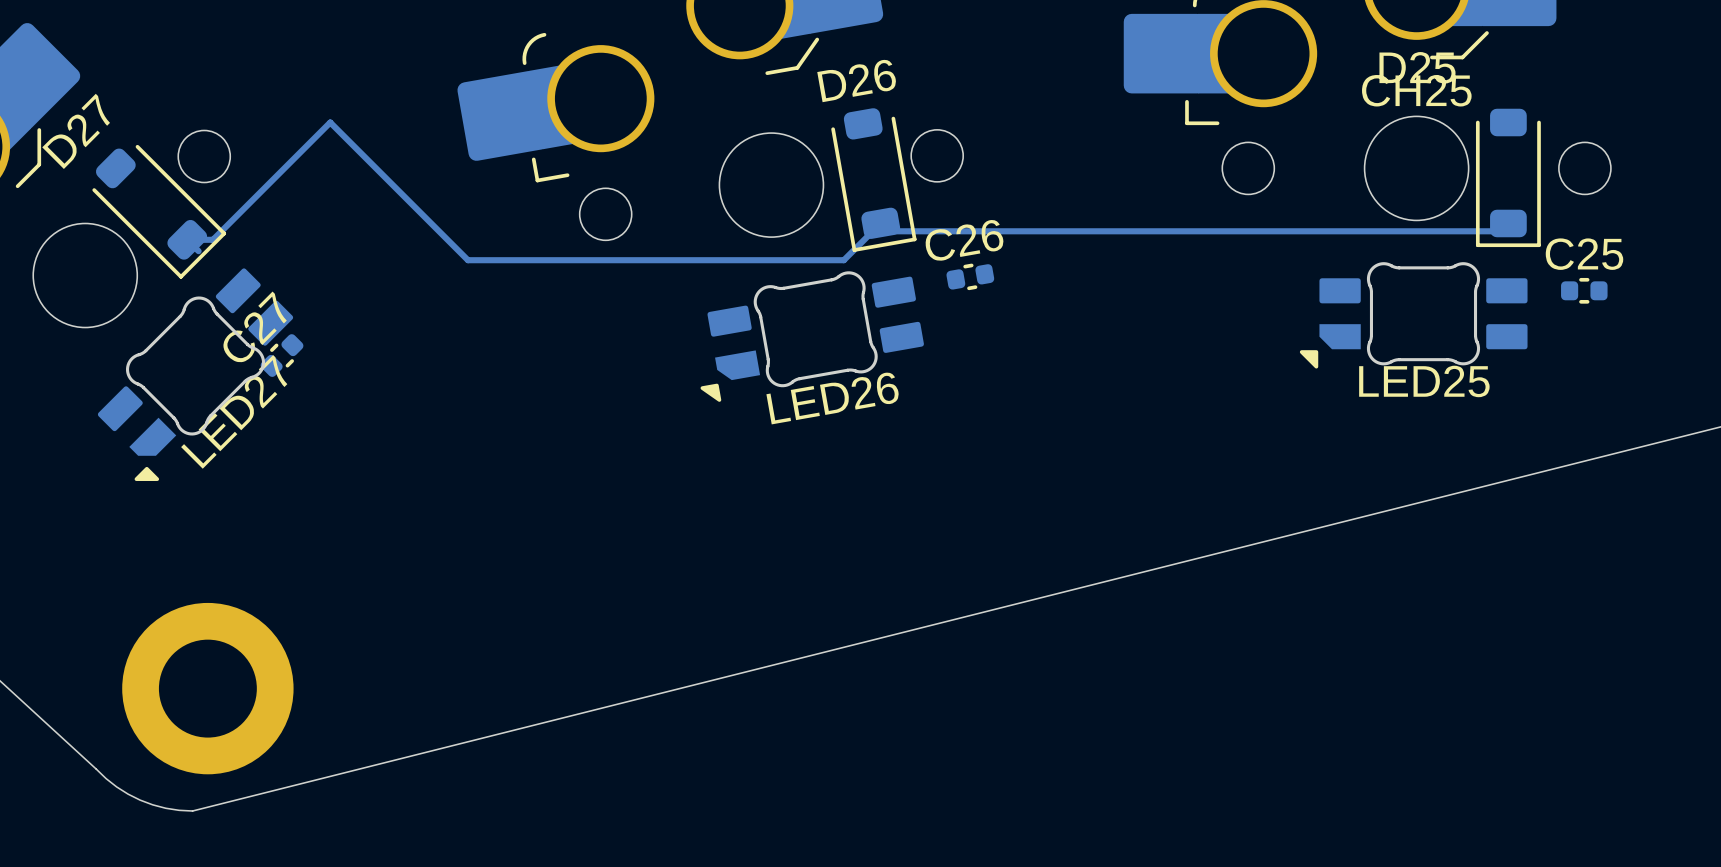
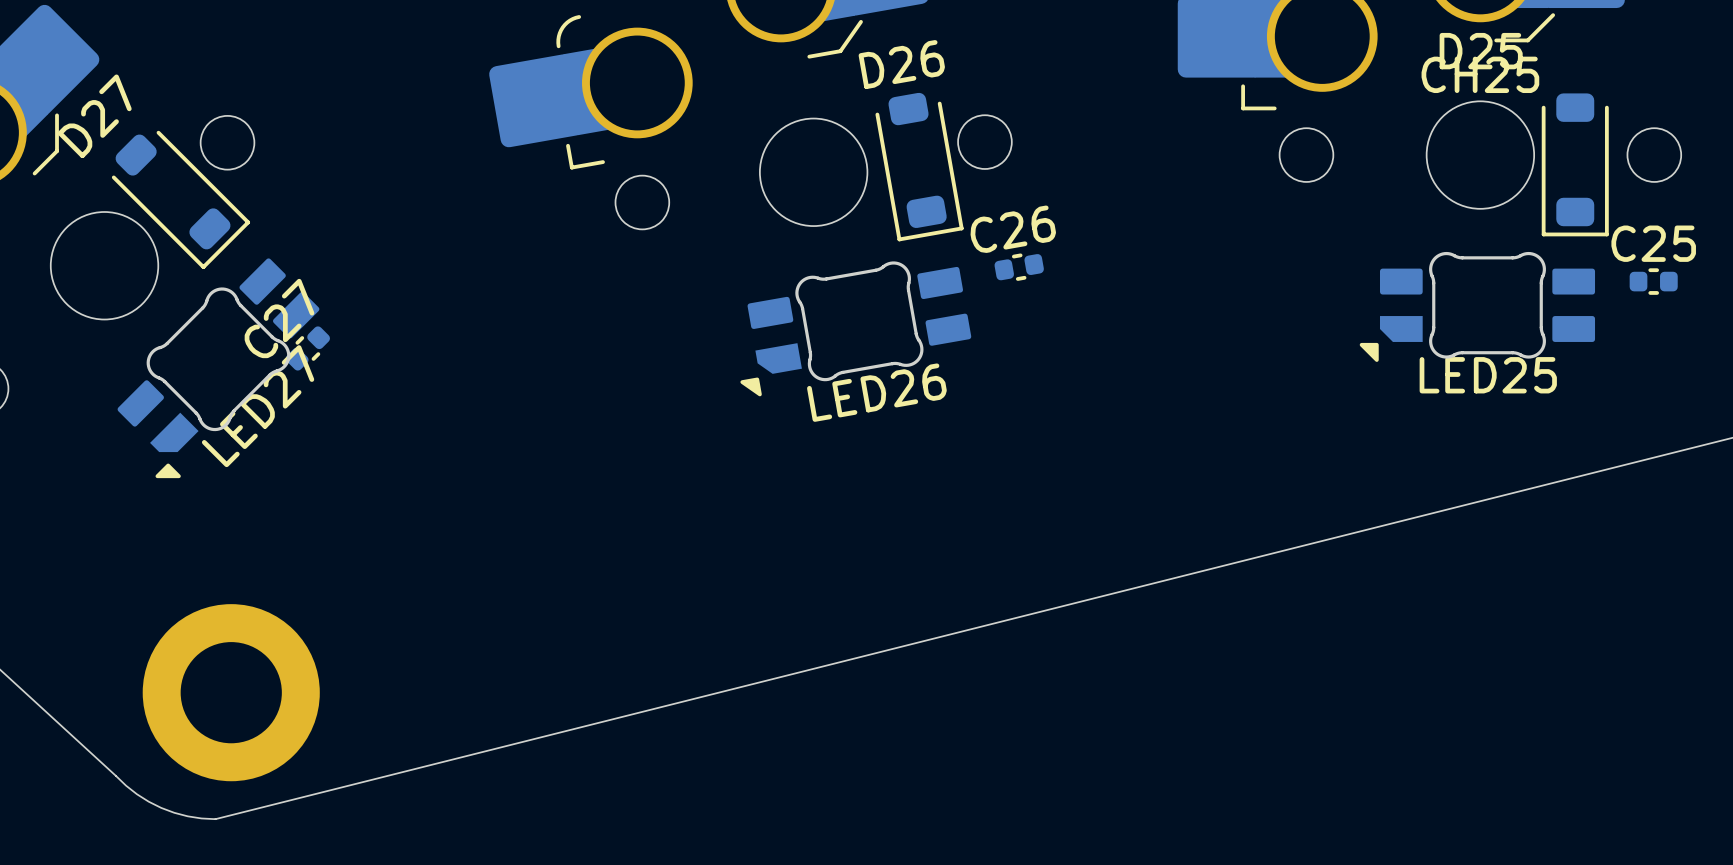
track: (1508, 223) (1500, 231) (888, 231) (880, 223) (843, 260) (467, 260) (330, 122) (212, 239) (187, 239) (198, 251) -> none

